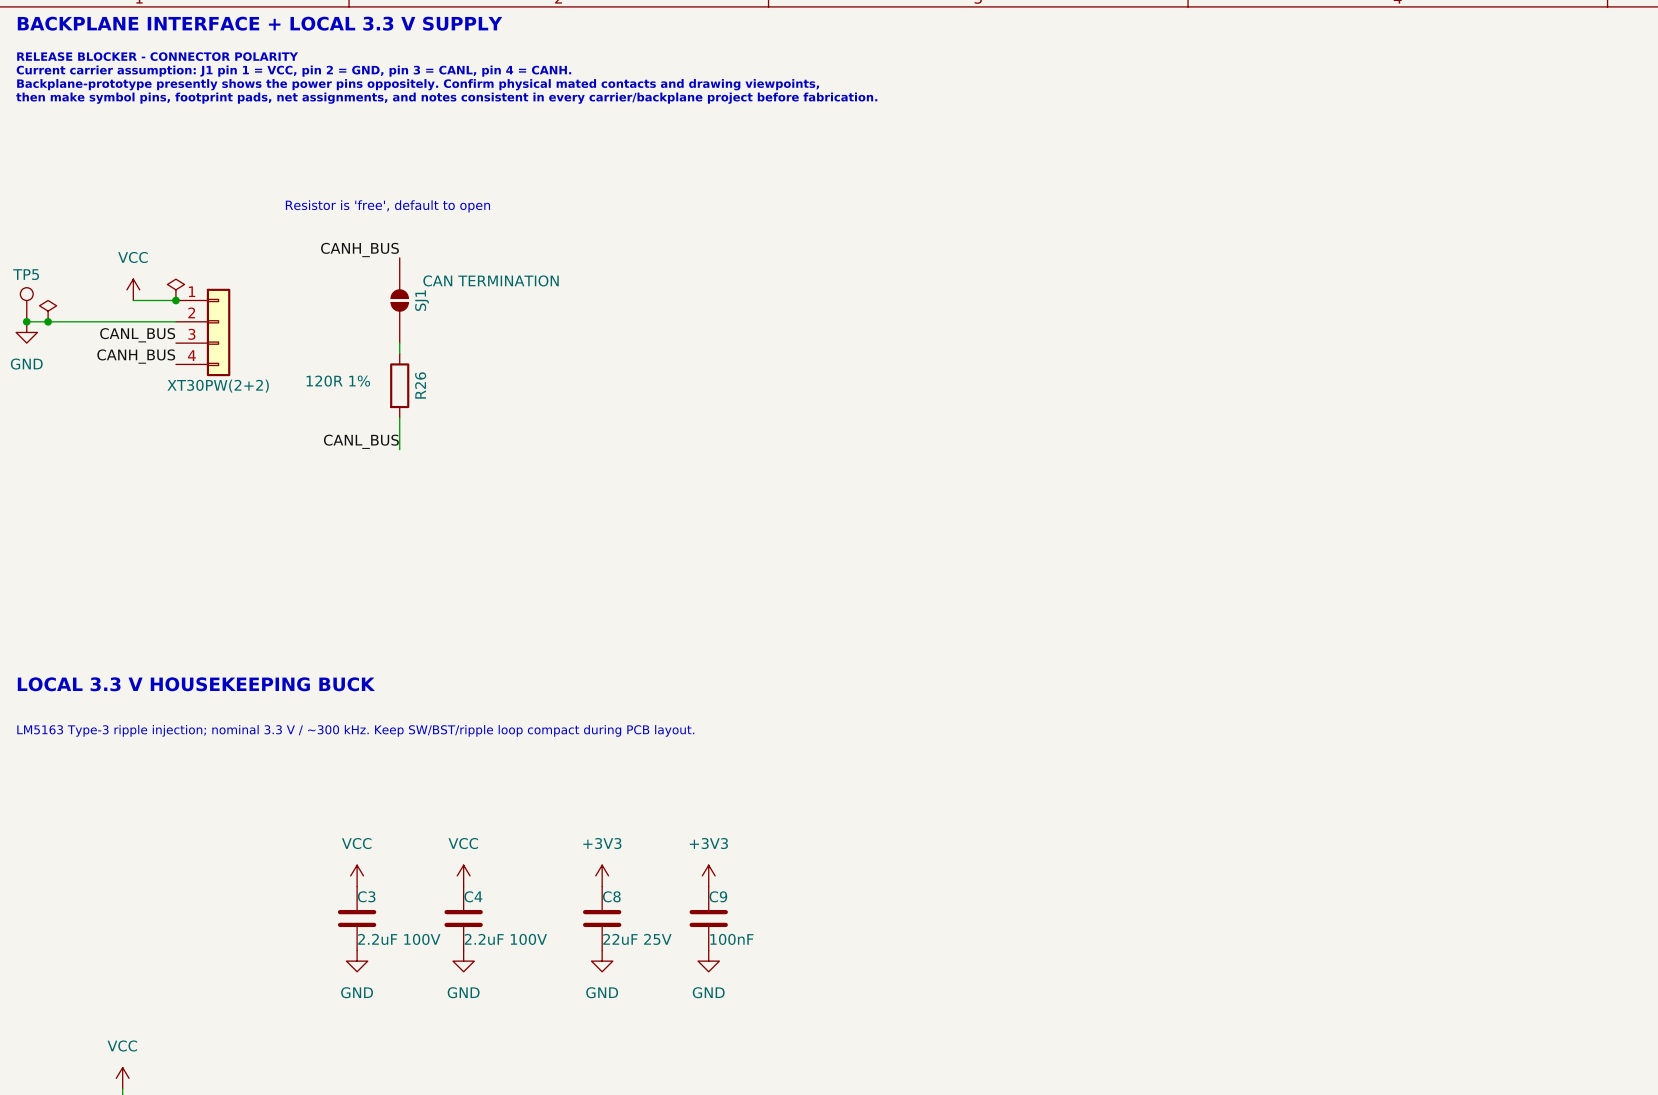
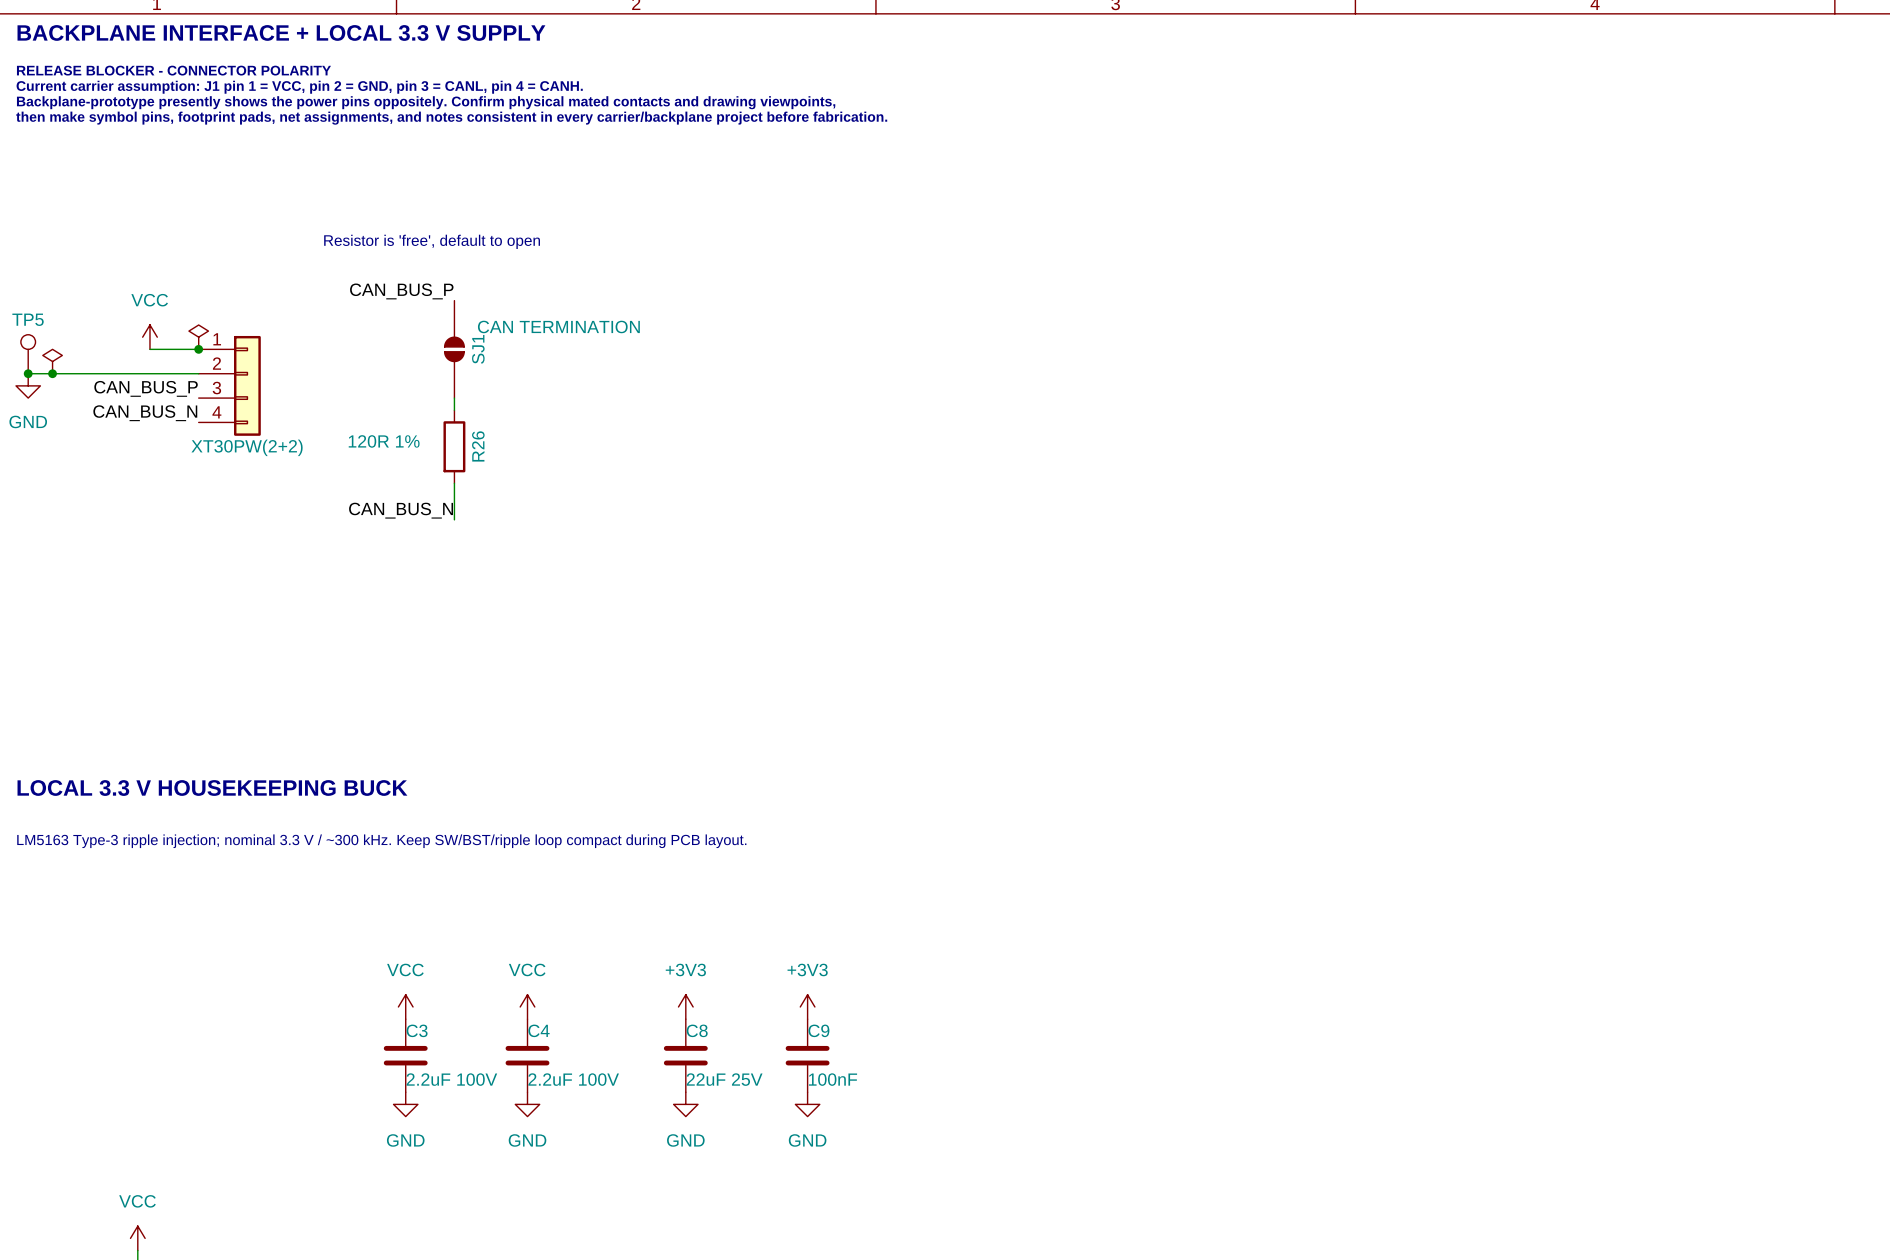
label: CANH_BUS (360, 249) -> CAN_BUS_P (401, 291)
label: CANL_BUS (137, 335) -> CAN_BUS_P (146, 388)
label: CANH_BUS (136, 356) -> CAN_BUS_N (145, 413)
label: CANL_BUS (361, 441) -> CAN_BUS_N (401, 510)

